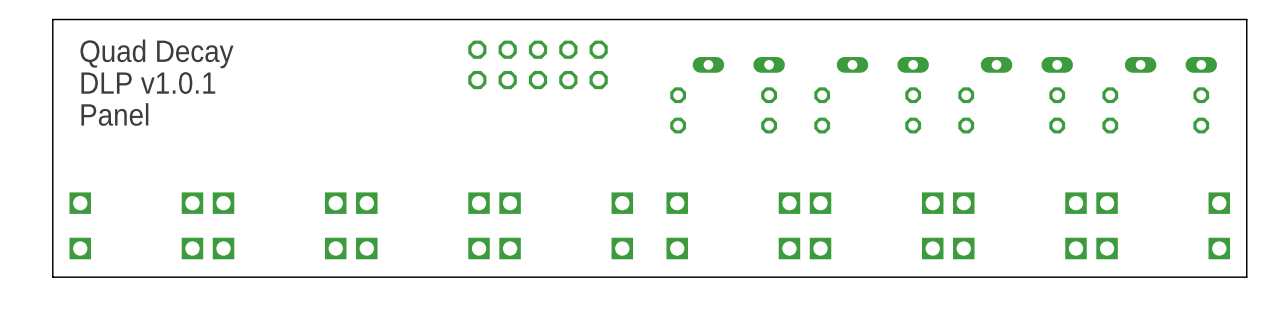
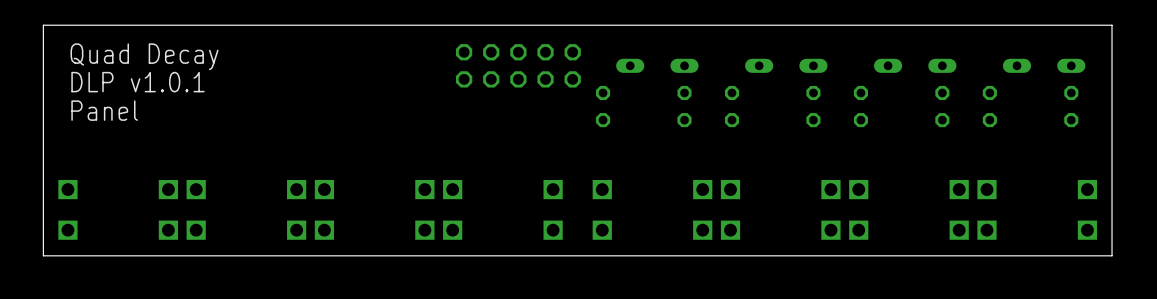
part position: (538, 64) -> (518, 65)

